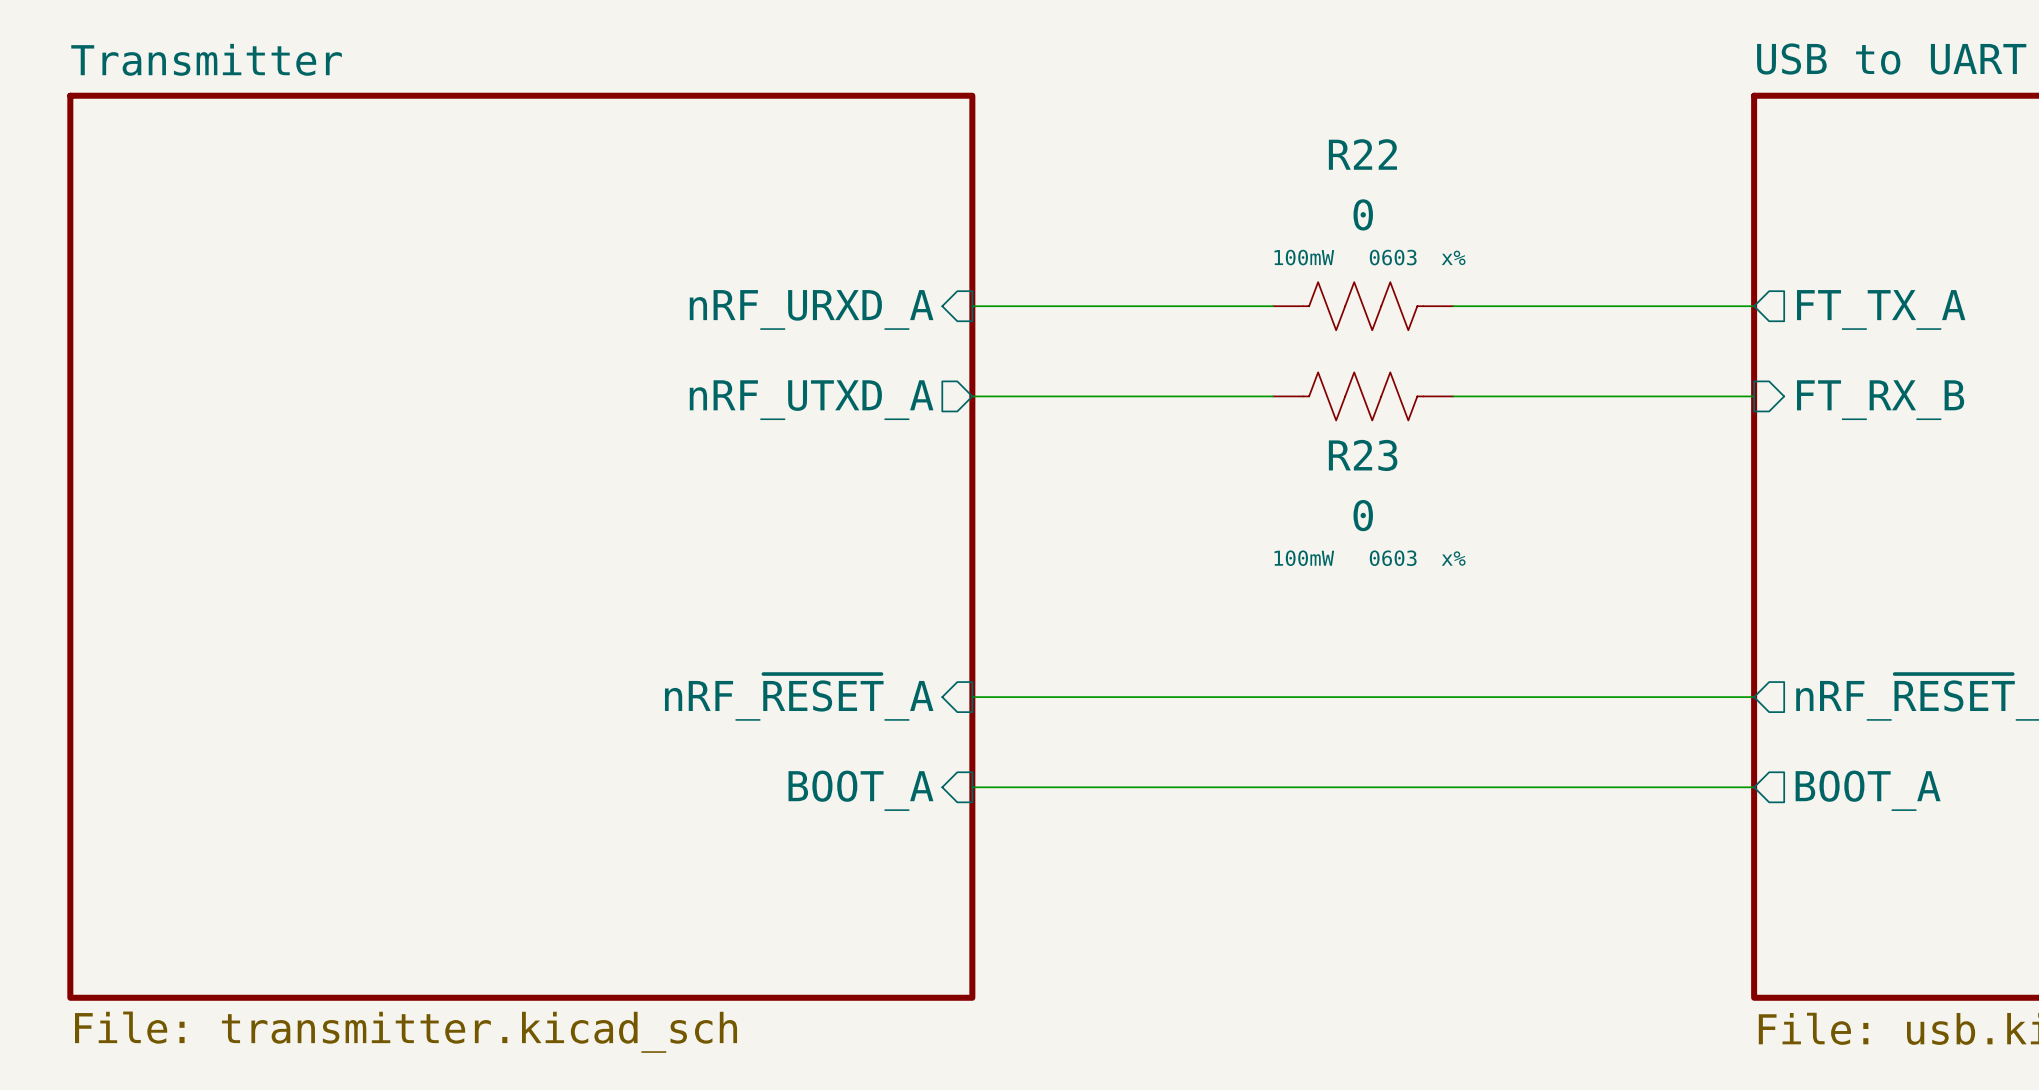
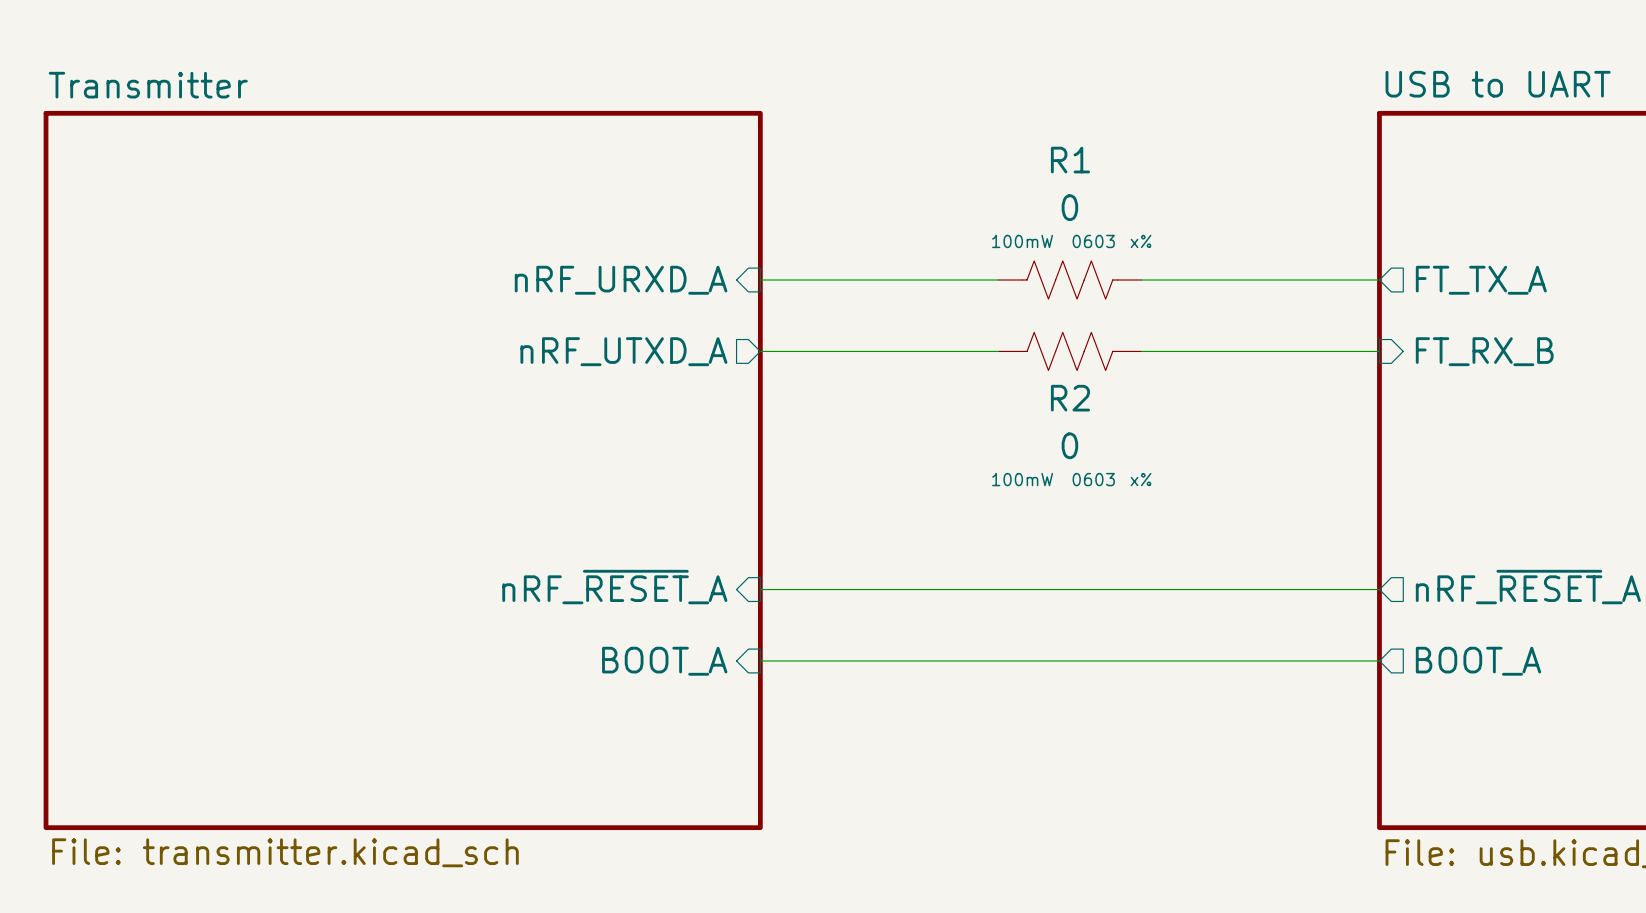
R22 name: R22 (1362, 154) -> R1 (1070, 160)
R23 name: R23 (1363, 455) -> R2 (1070, 398)

